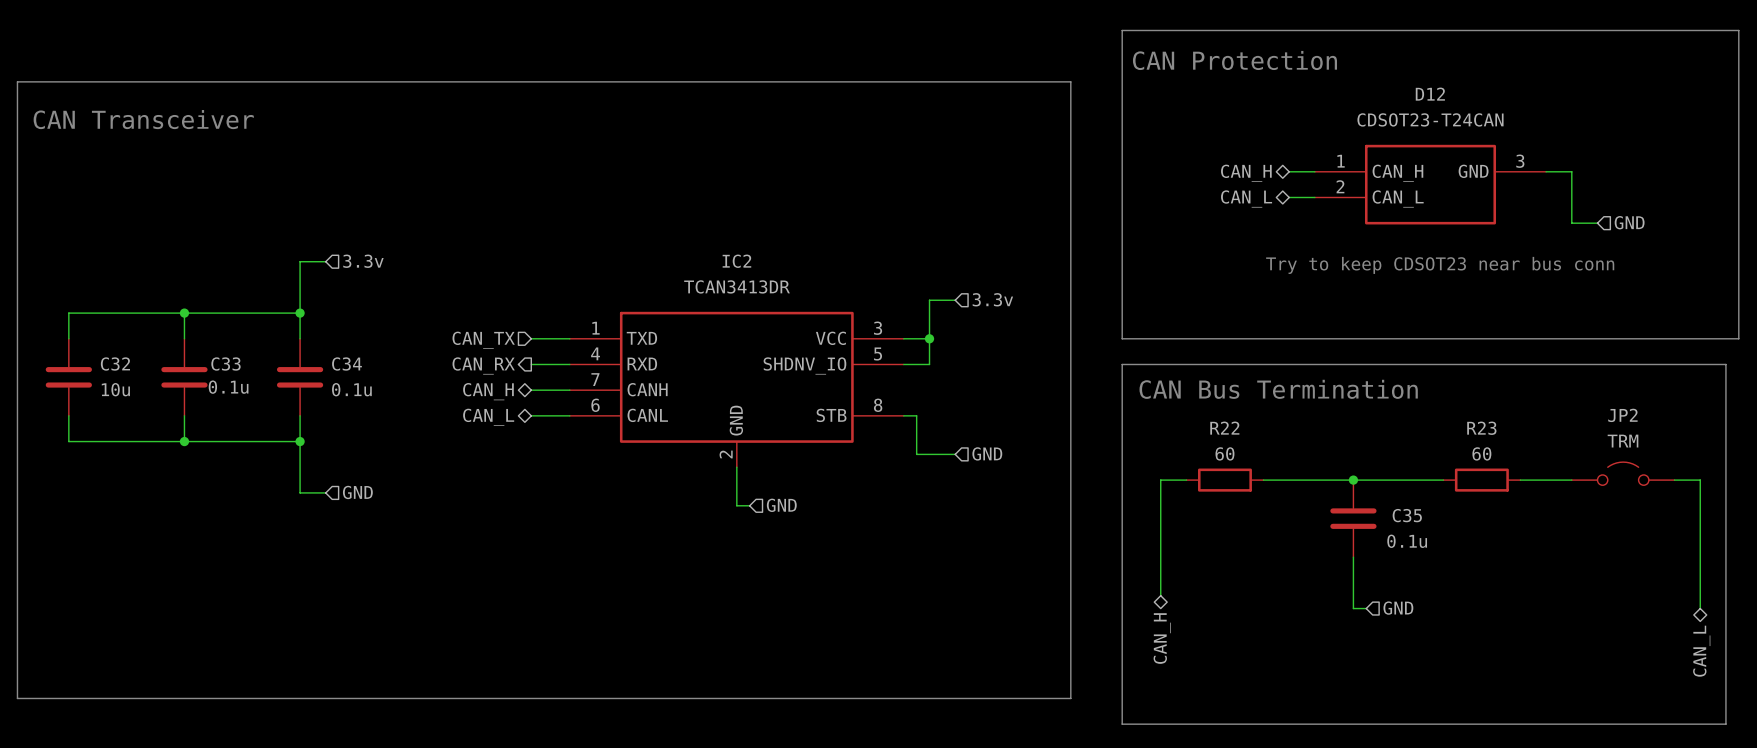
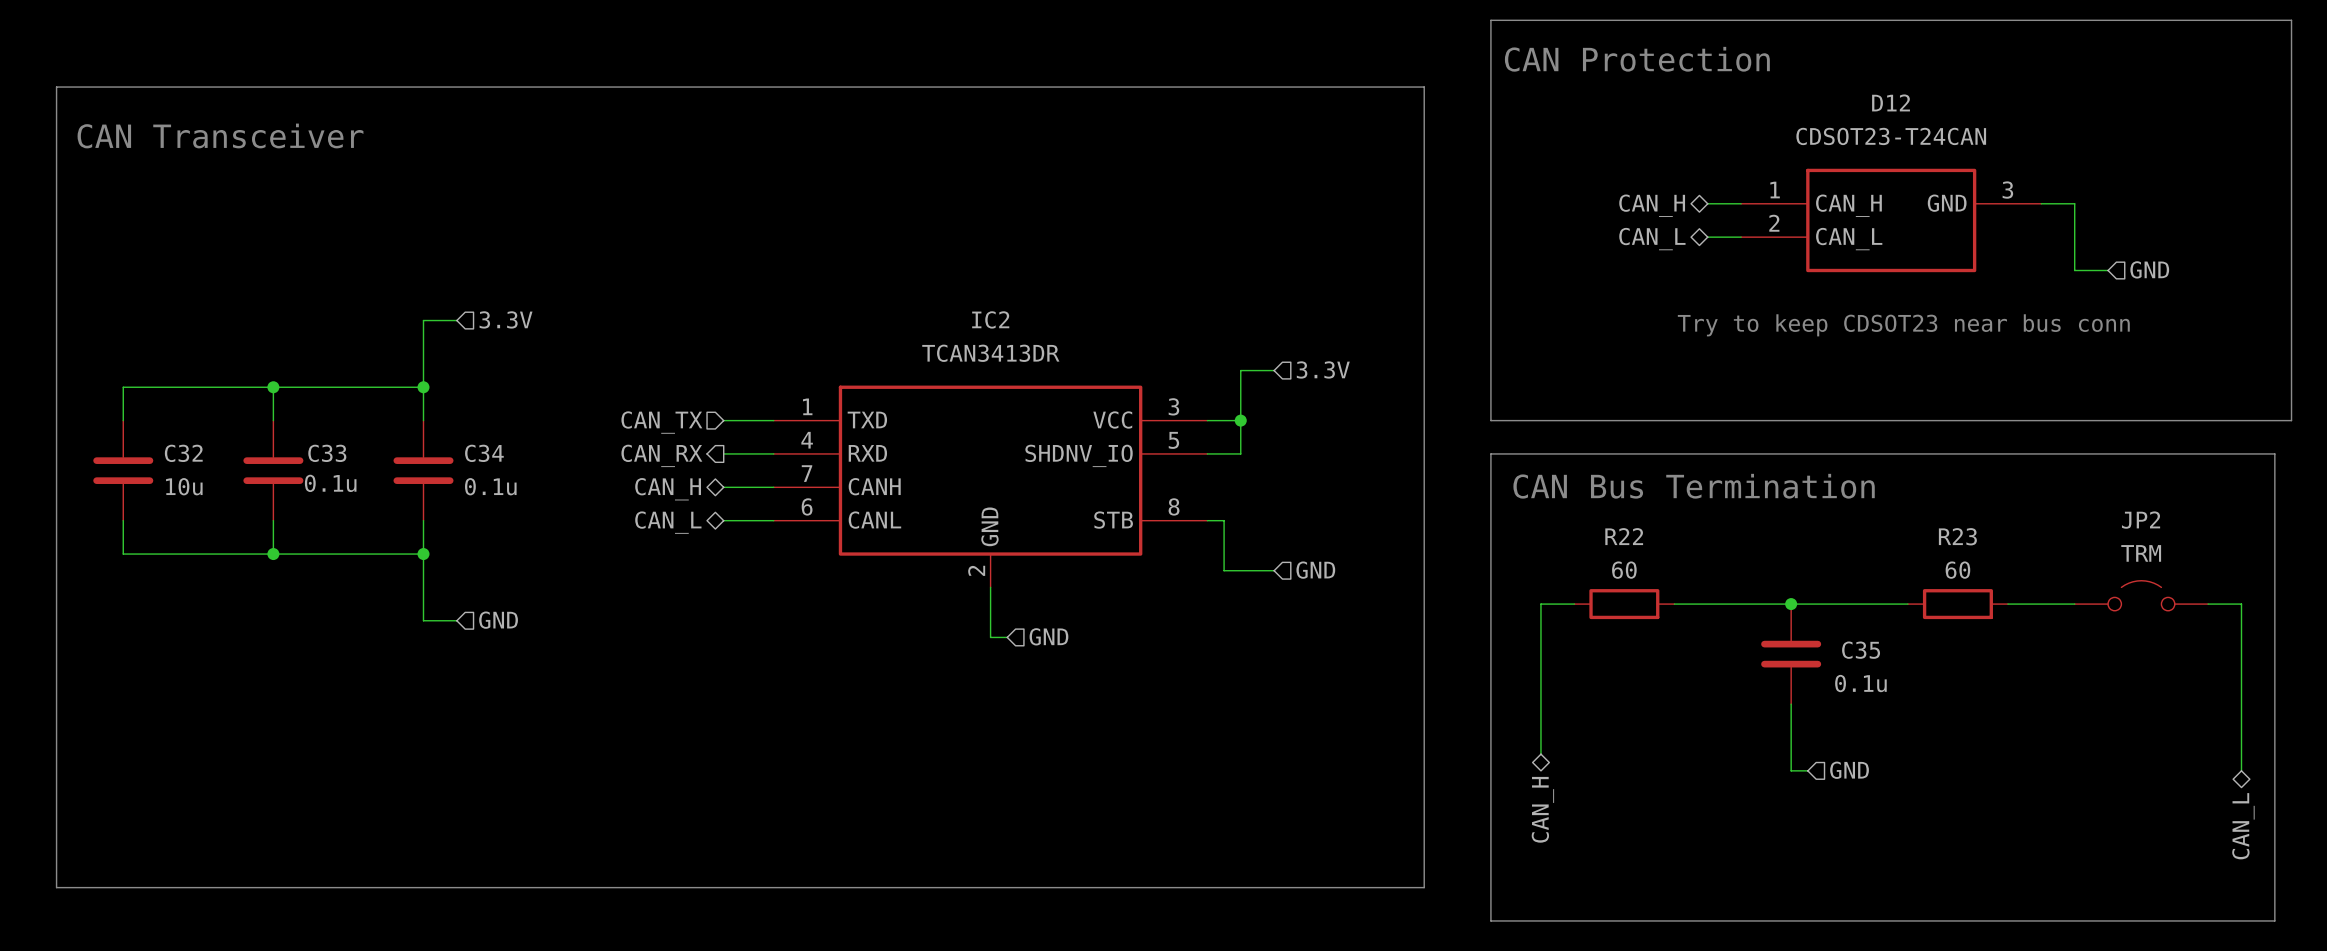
hierarchical label: 3.3v (363, 261) -> 3.3V (506, 319)
hierarchical label: 3.3v (992, 299) -> 3.3V (1323, 369)

